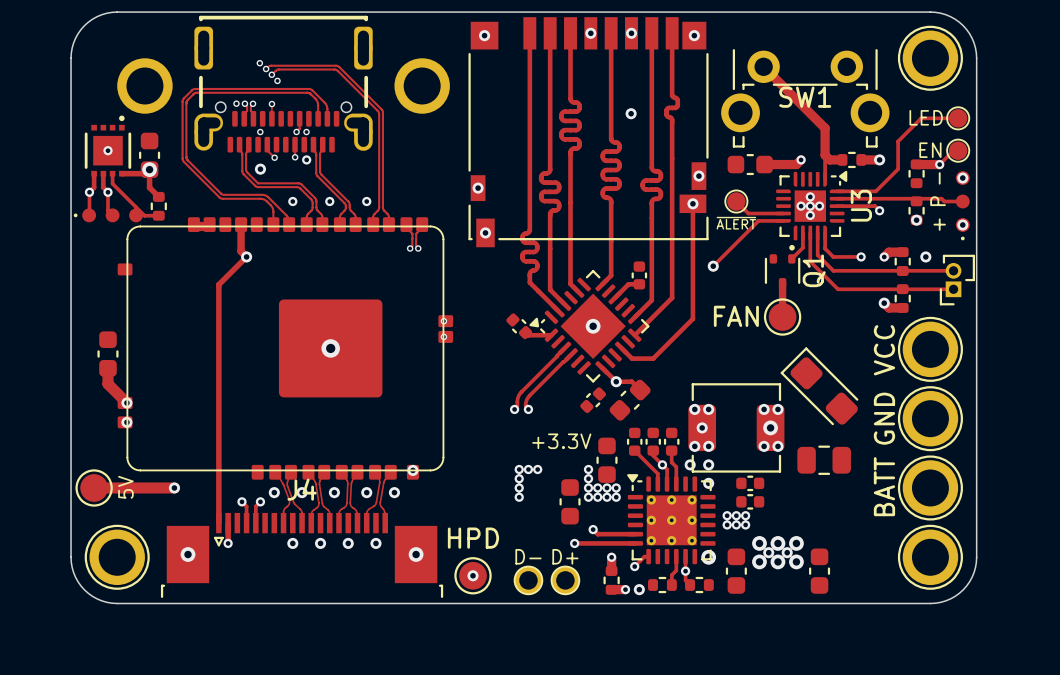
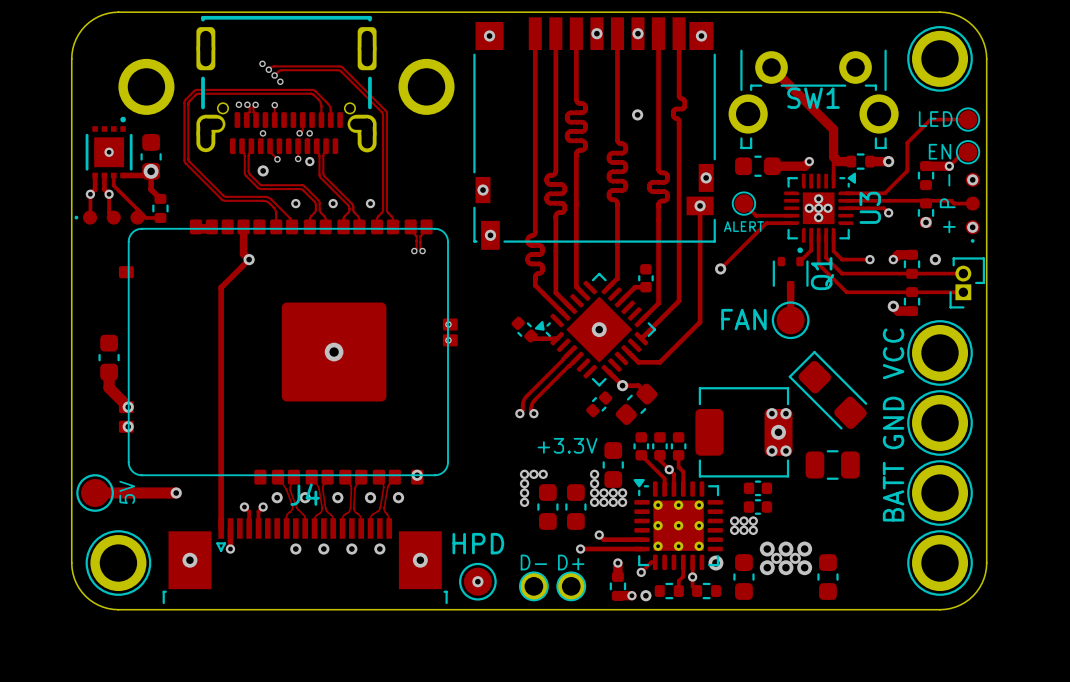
part value: ~{ALERT} (736, 223) -> ALERT (743, 226)
via: (694, 409) -> none
via: (708, 409) -> none
via: (702, 427) -> none
via: (694, 446) -> none
via: (708, 446) -> none
via: (690, 464) -> none
via: (708, 464) -> none
via: (708, 483) -> none
part: none -> (547, 507)

